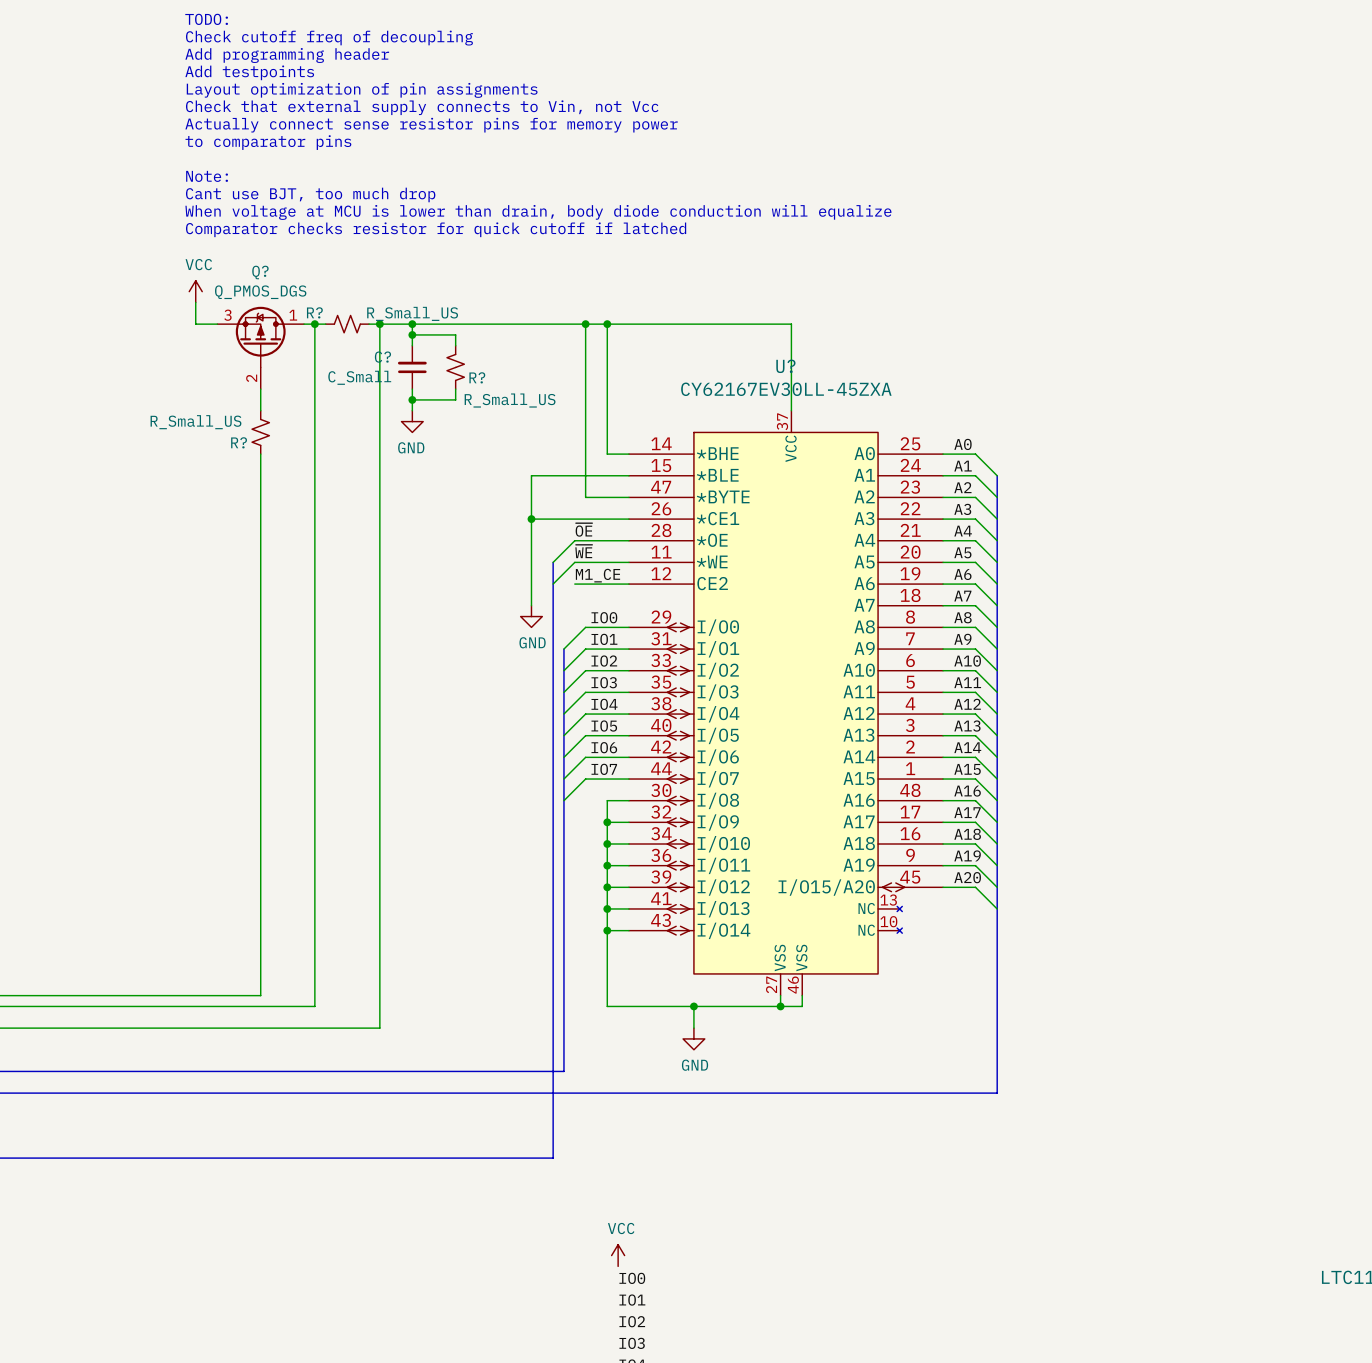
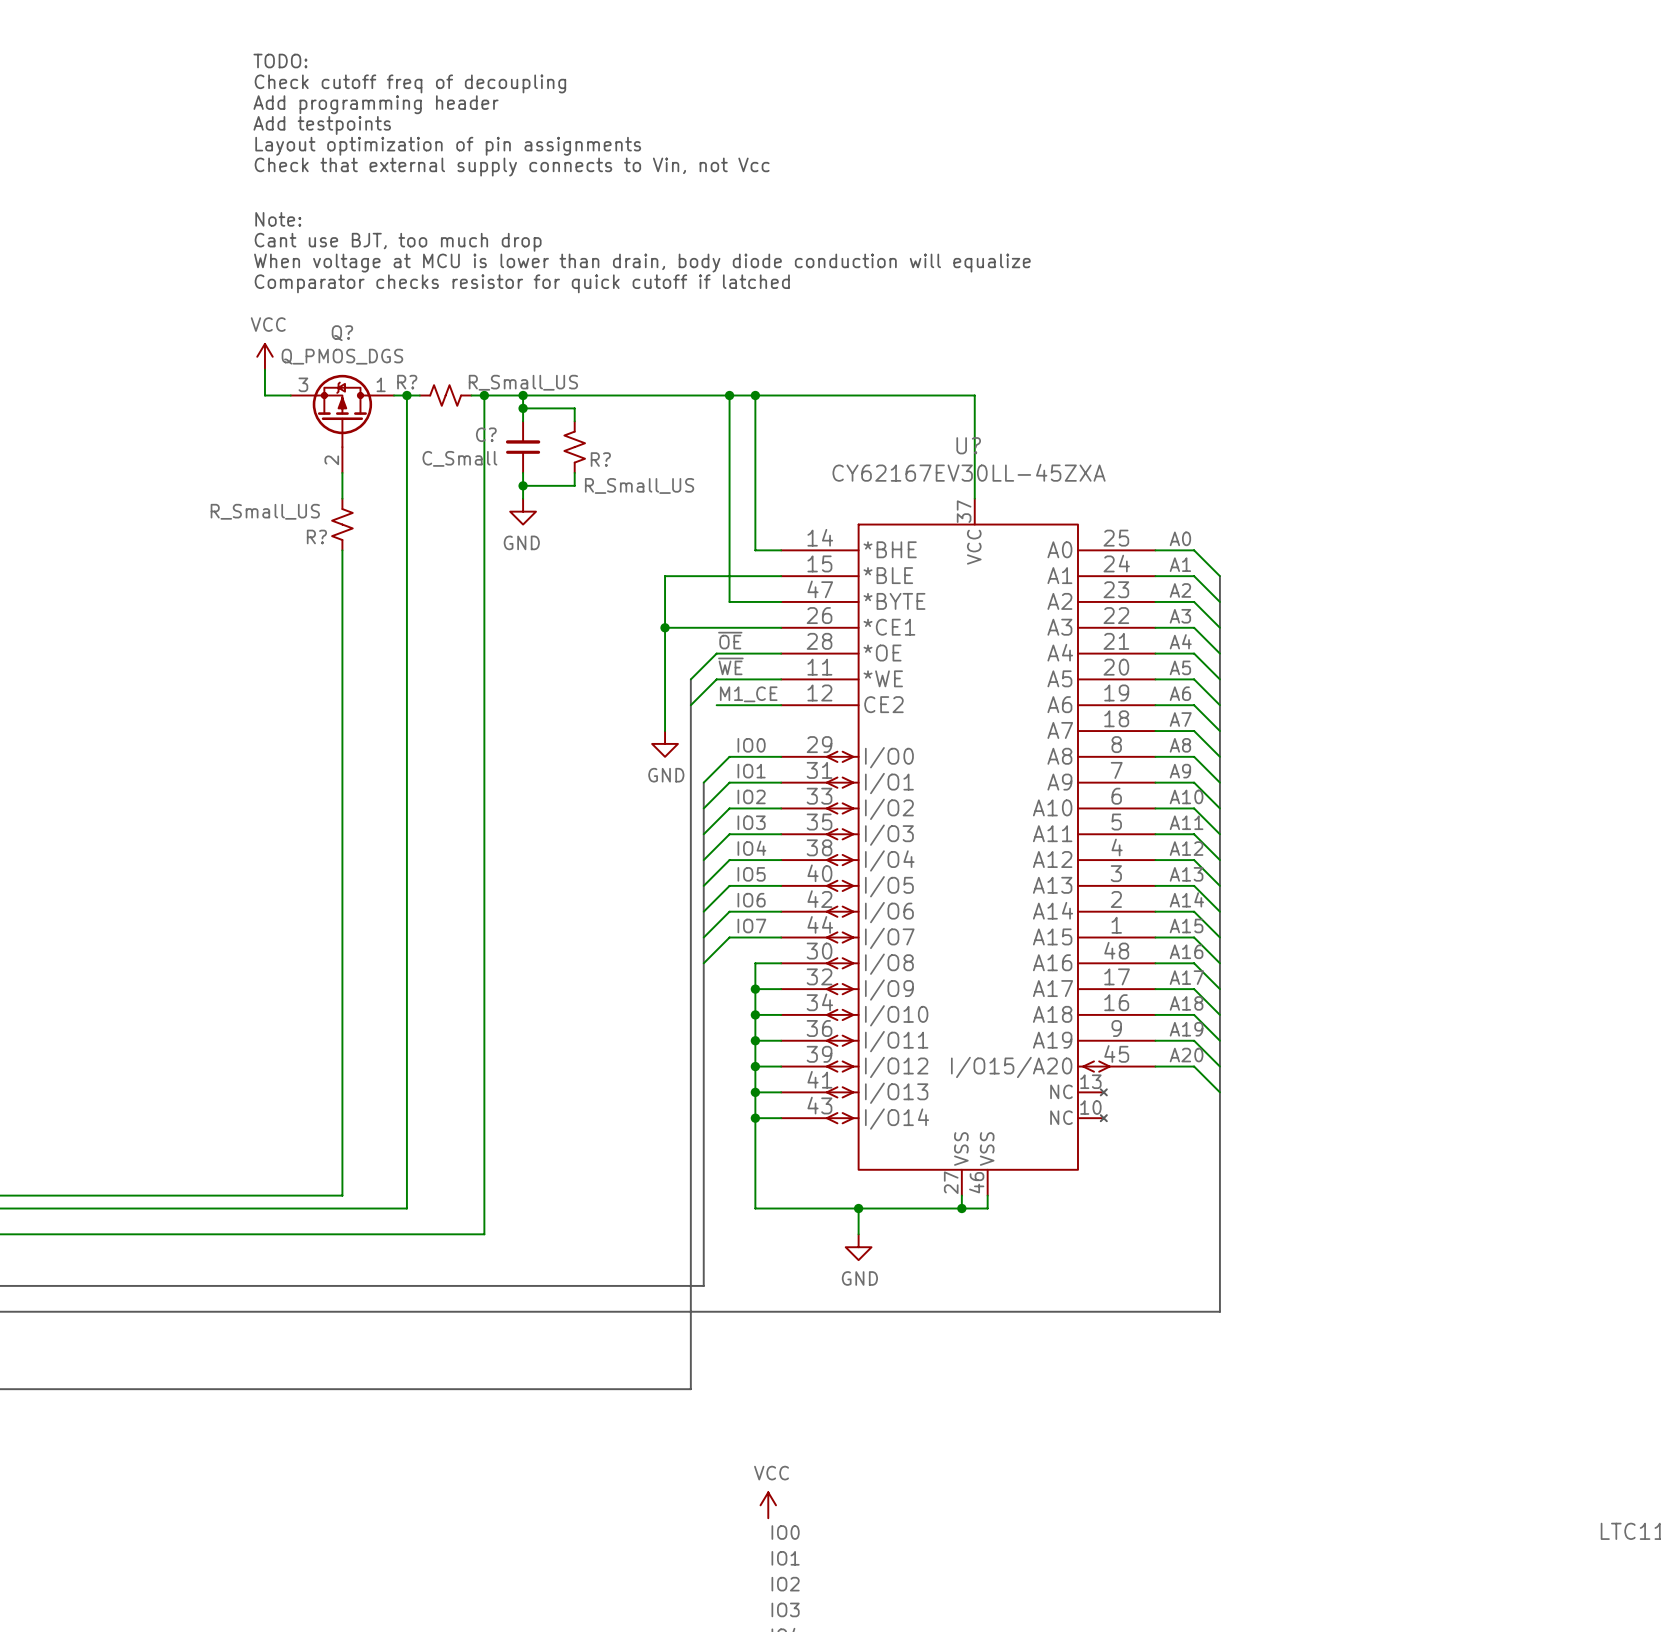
text position: TODO: (206, 19) -> TODO: (280, 61)
text position: Check cutoff freq of decoupling (329, 38) -> Check cutoff freq of decoupling (410, 83)
text position: Add programming header (287, 55) -> Add programming header (376, 104)
text position: Add testpoints (249, 72) -> Add testpoints (322, 125)
text position: Layout optimization of pin assignments (362, 90) -> Layout optimization of pin assignments (448, 146)
text position: Check that external supply connects to Vin, not Vcc (422, 107) -> Check that external supply connects to Vin, not Vcc (512, 167)
text: Actually connect sense resistor pins for memory power (431, 125) -> none
text: to comparator pins (268, 142) -> none

